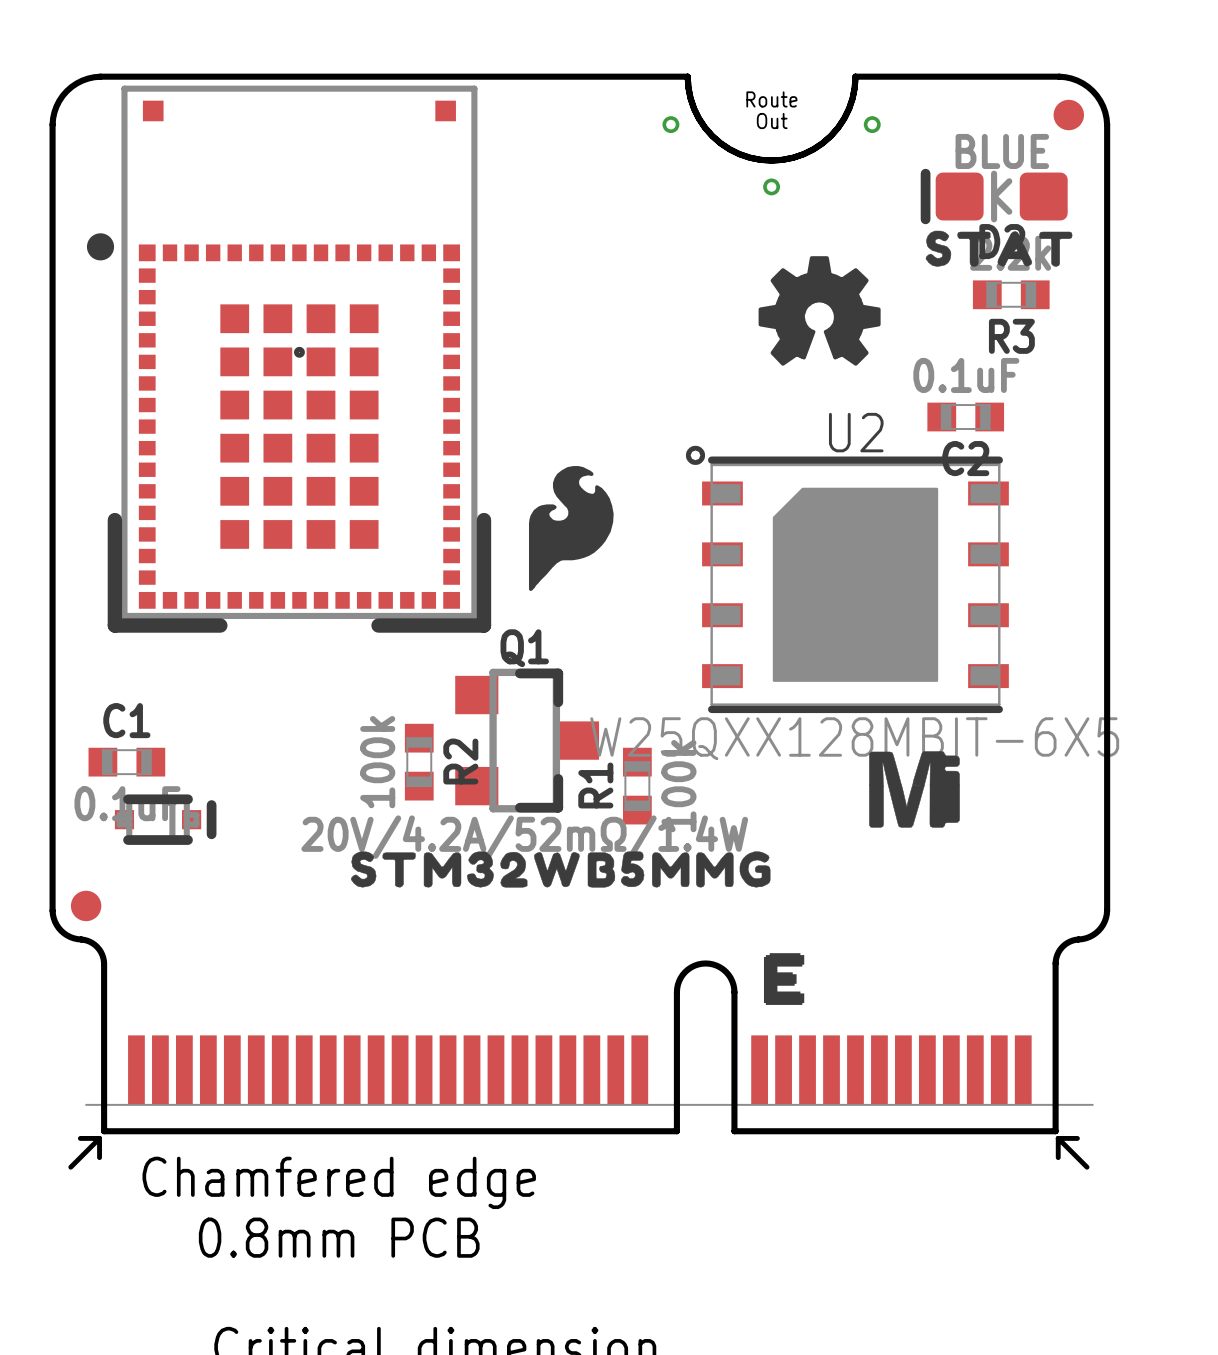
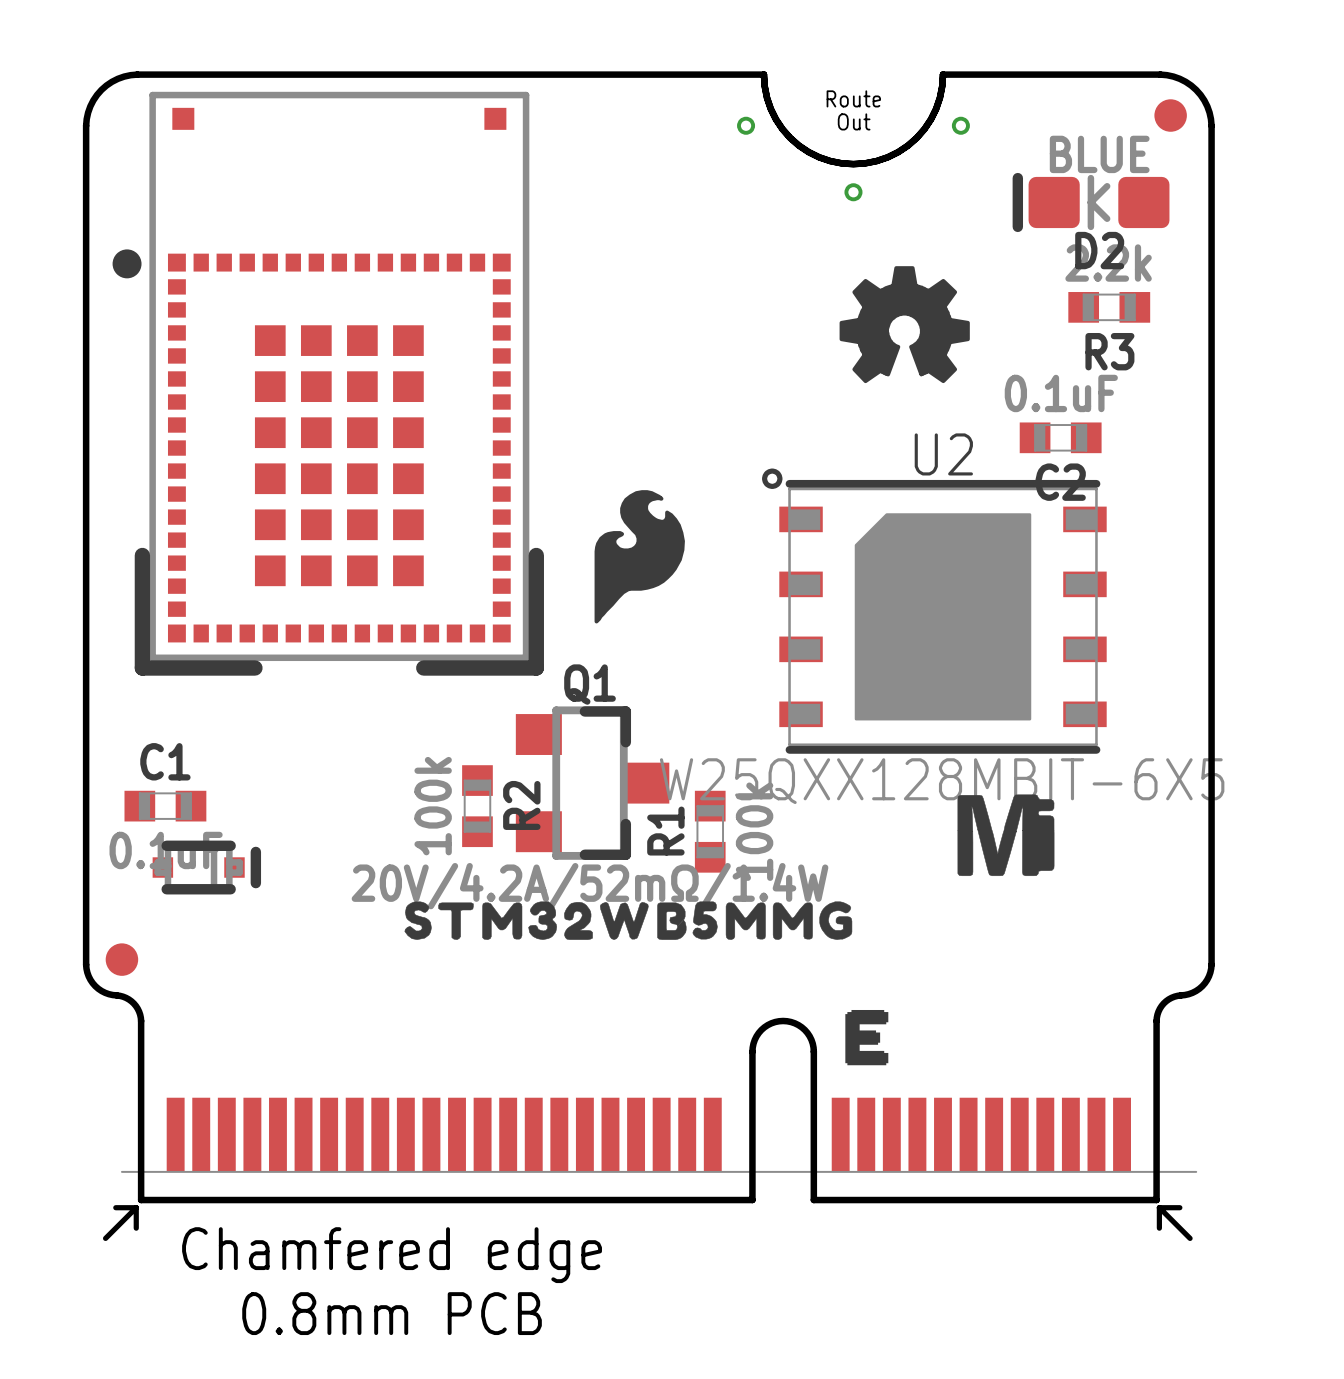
part footprint: [86, 85, 492, 633] -> [112, 91, 544, 676]
drawing: [925, 230, 1073, 267] -> none

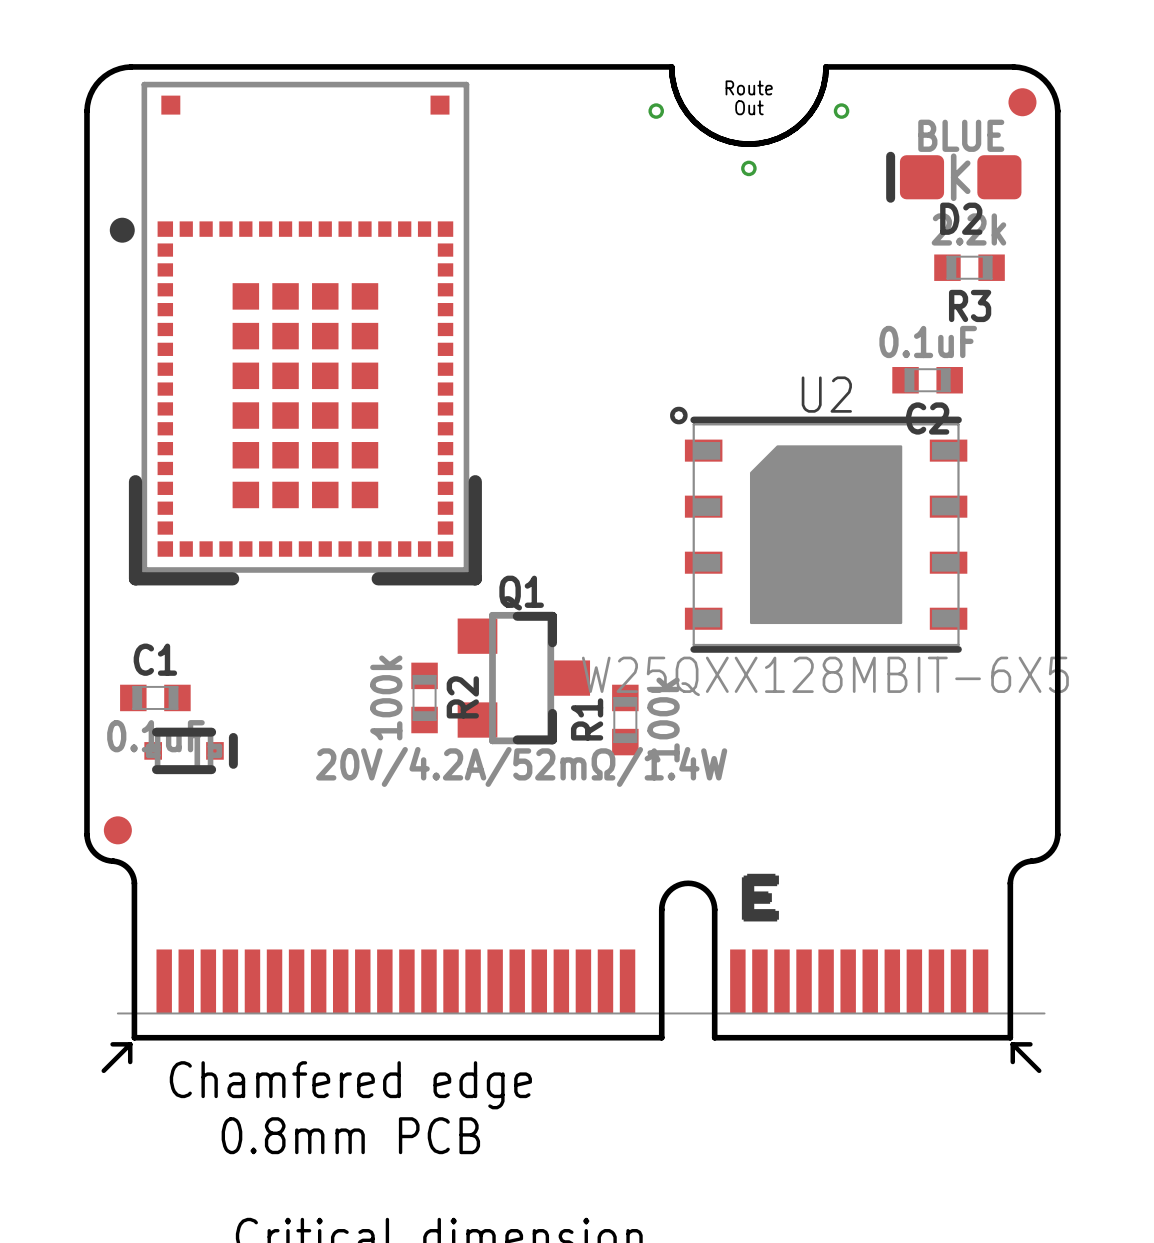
drawing: [839, 266, 970, 384] -> none
drawing: [594, 490, 685, 624] -> none
drawing: [957, 794, 1055, 877] -> none
drawing: [404, 901, 853, 940] -> none

